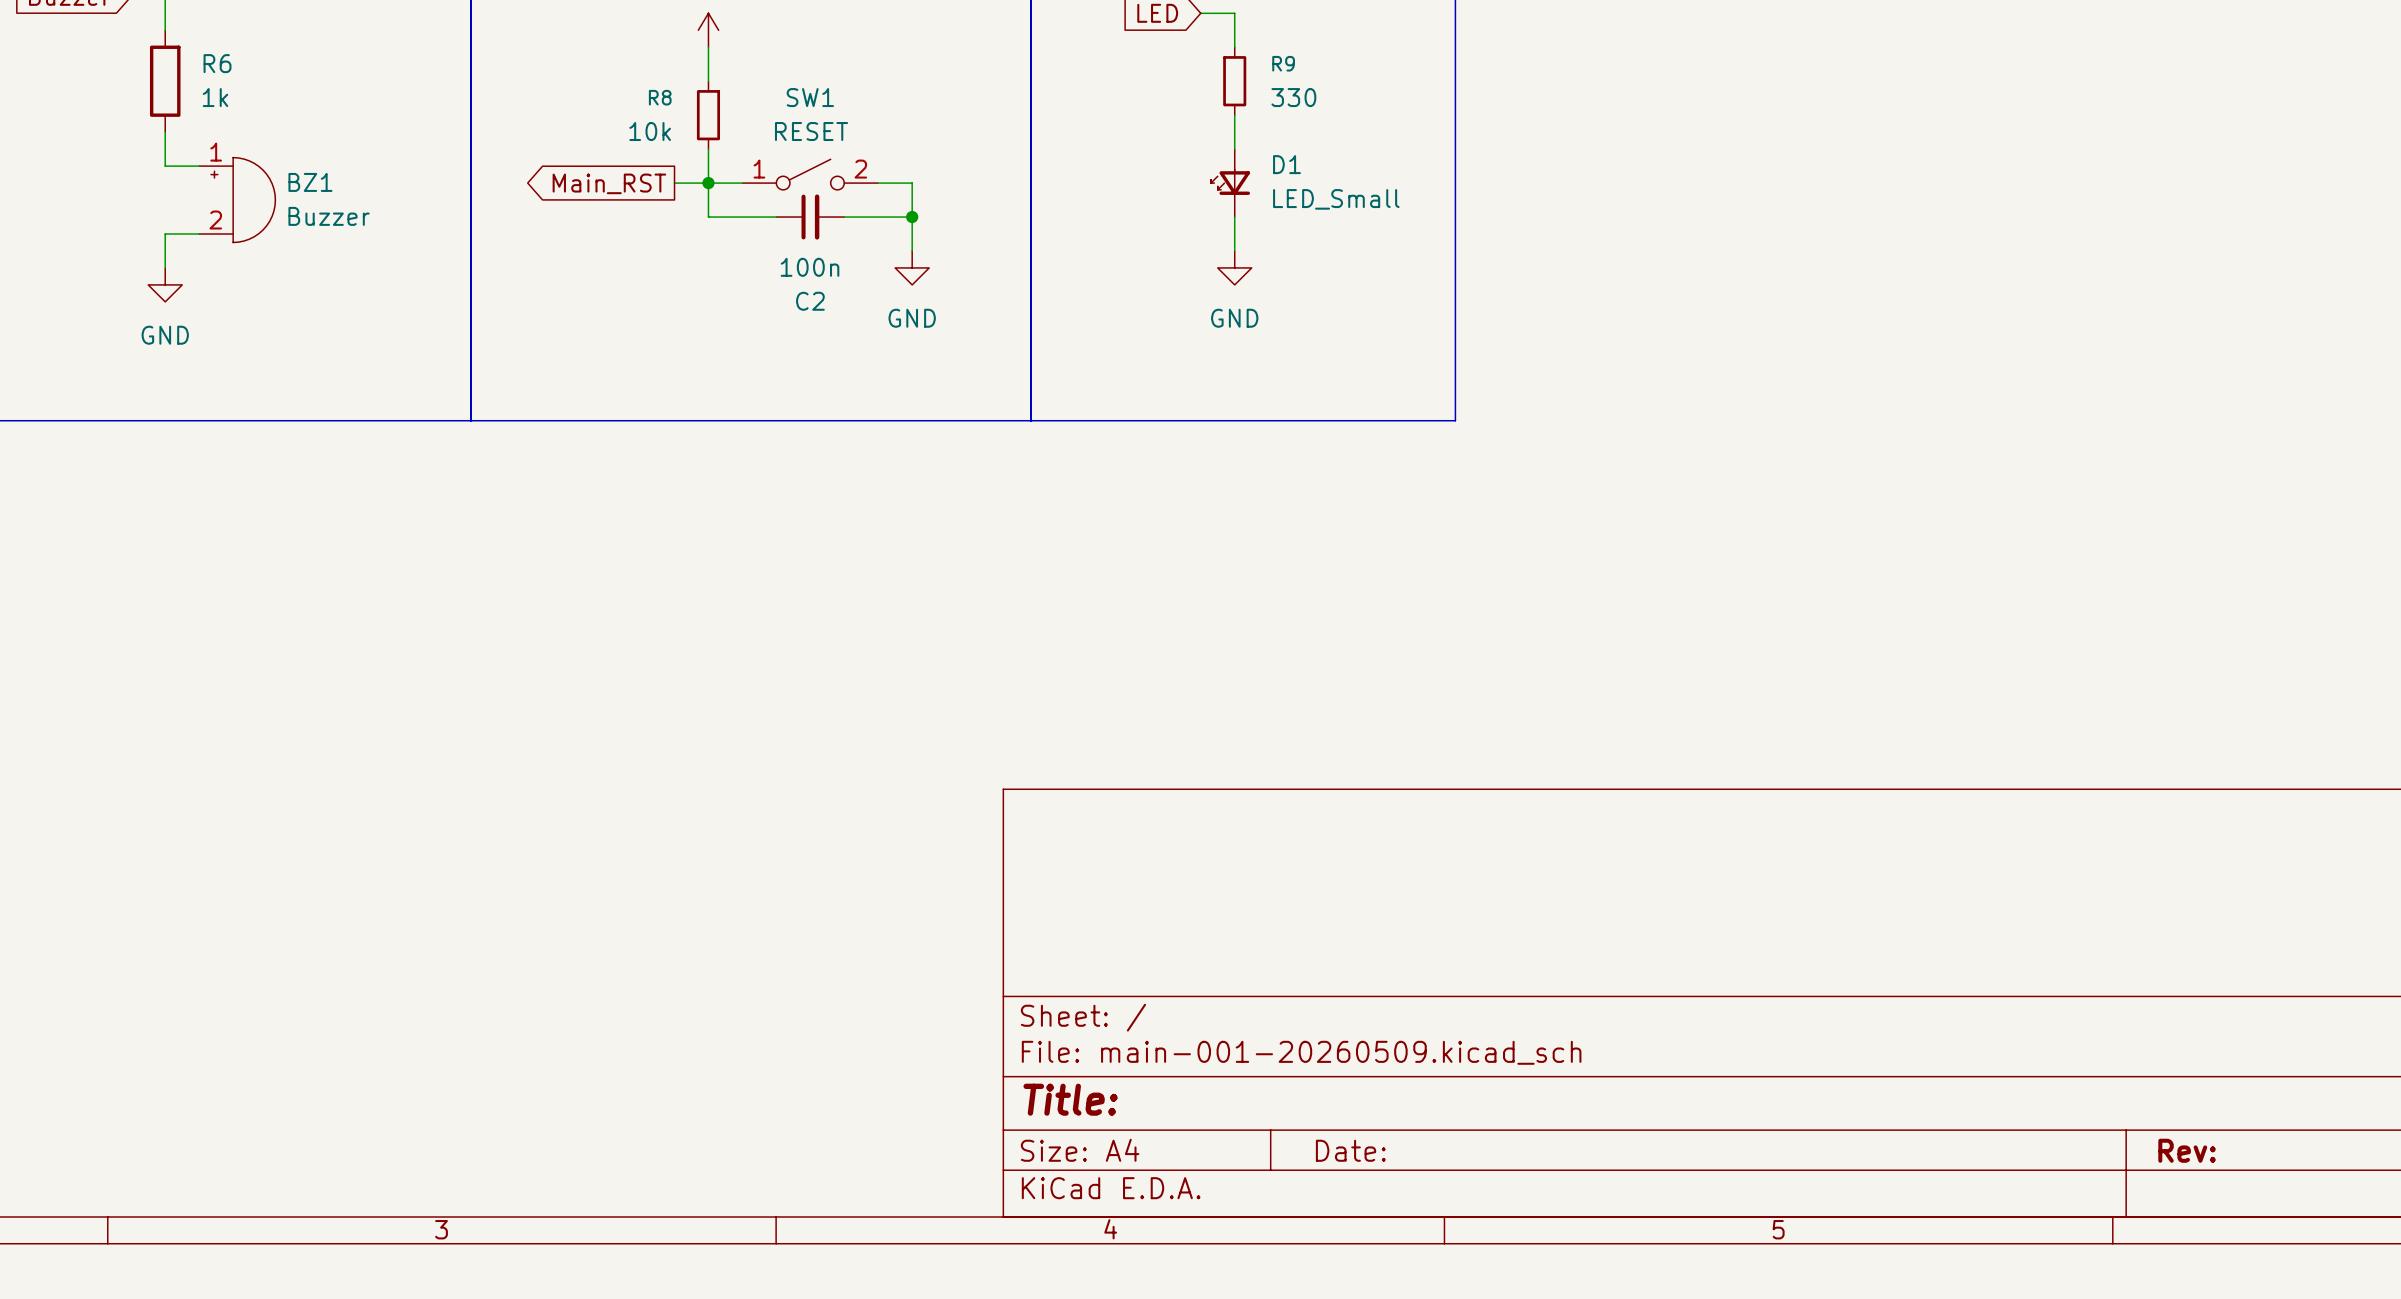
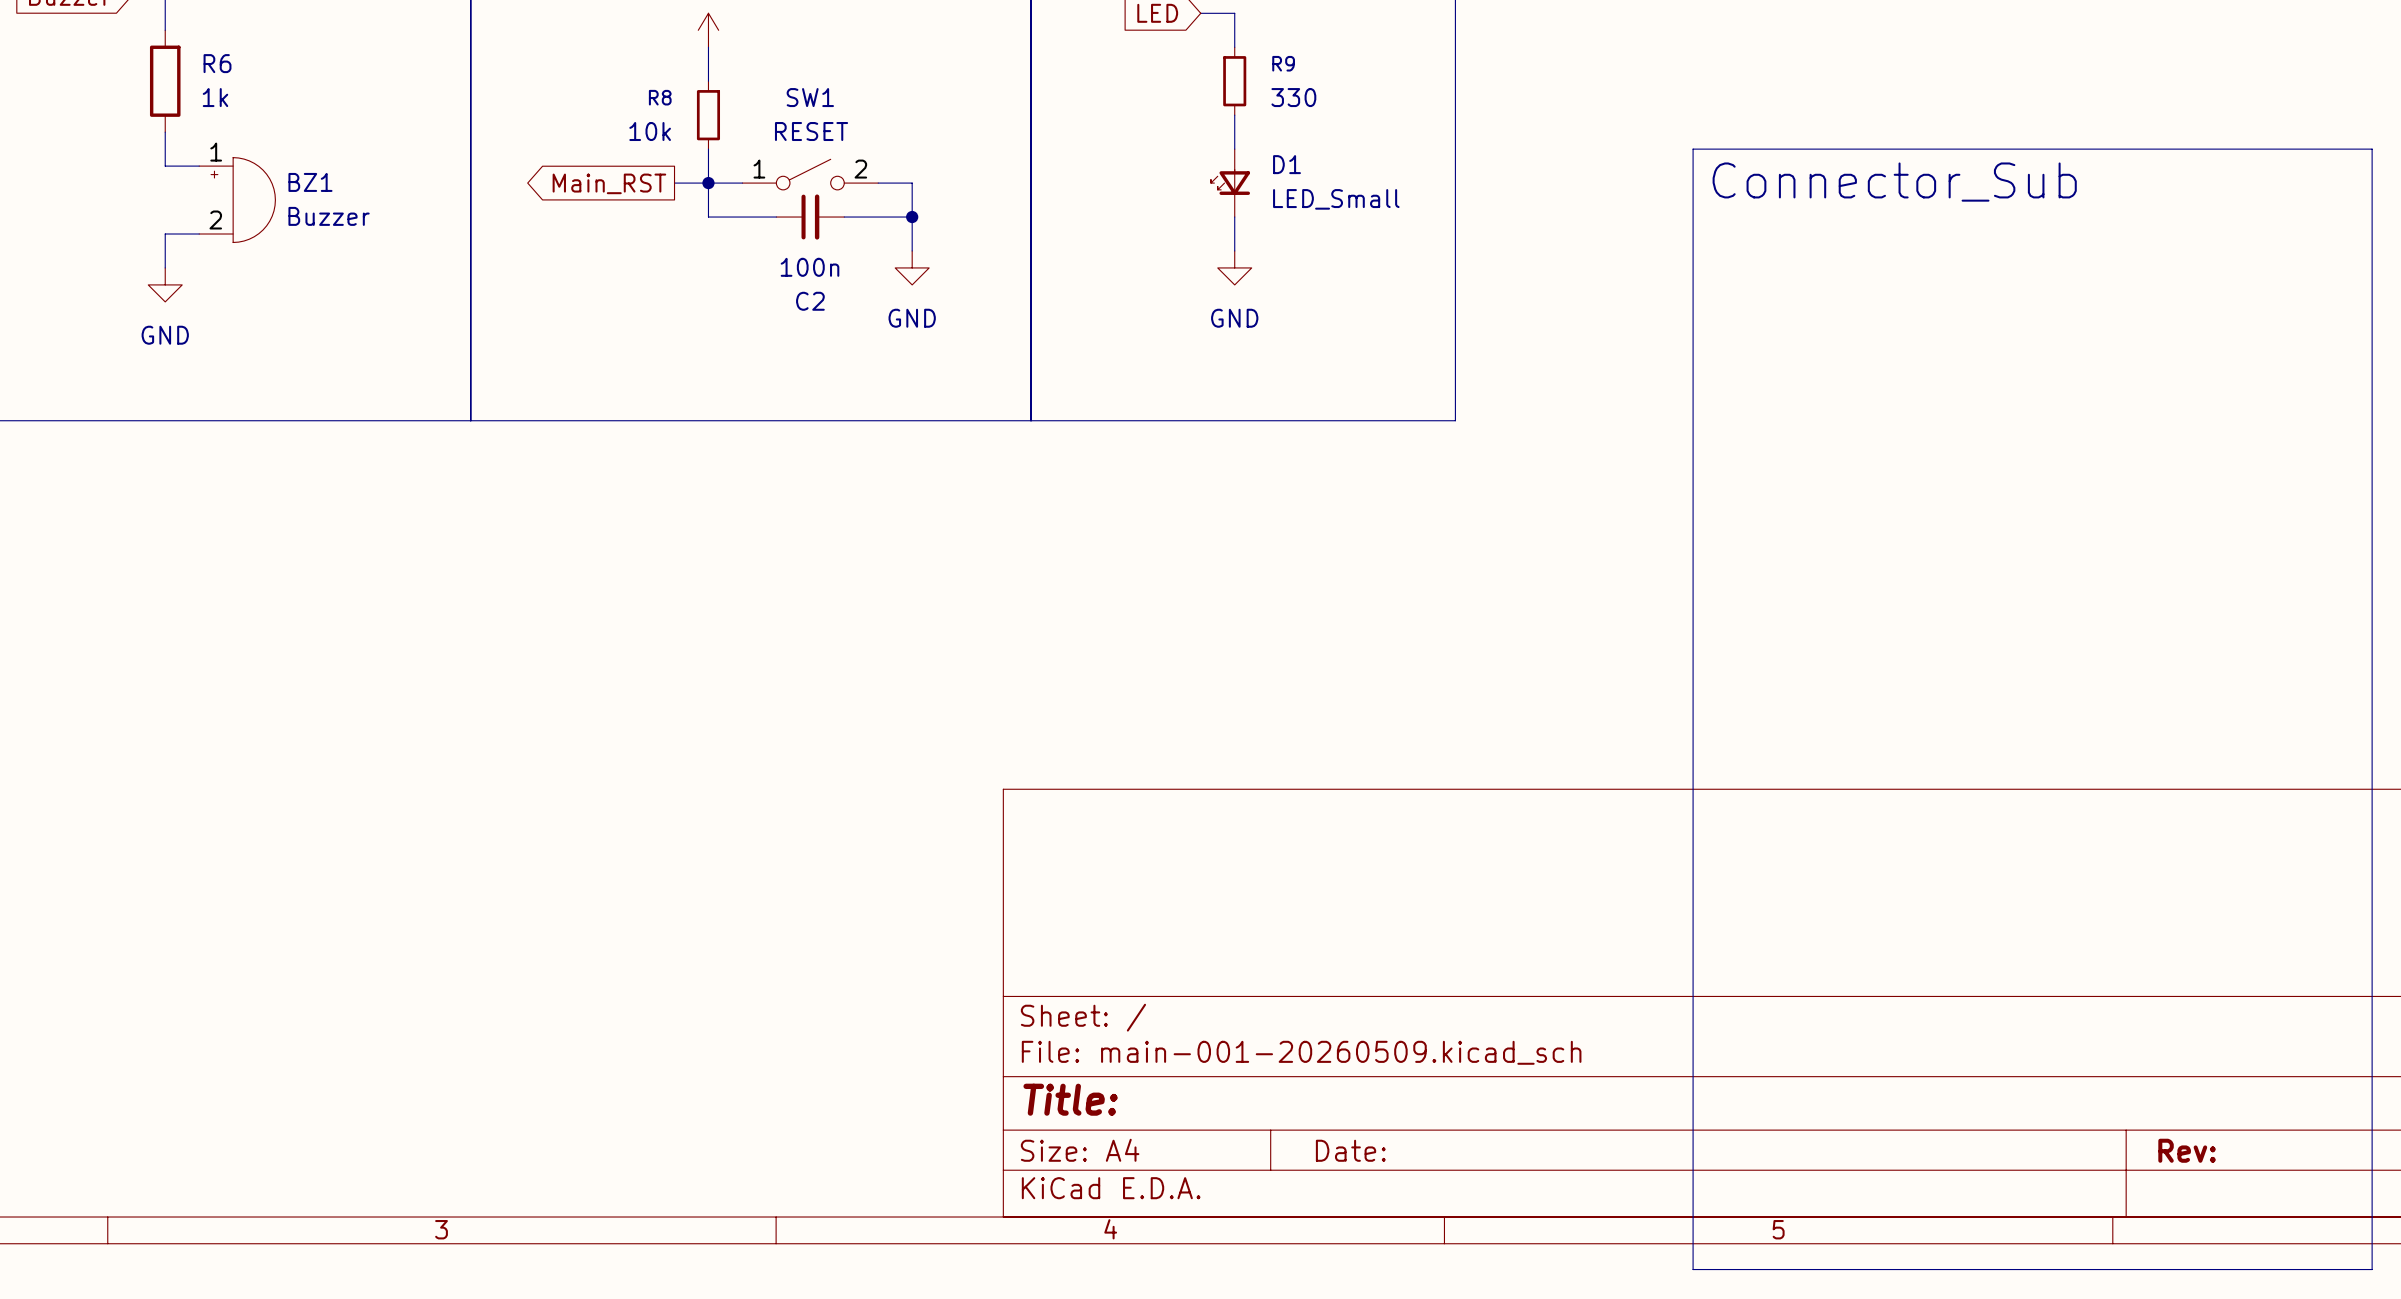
line: none -> (1693, 149) (2372, 149) (2372, 1269) (1693, 1269) (1693, 149)
text: none -> Connector_Sub (1894, 182)

